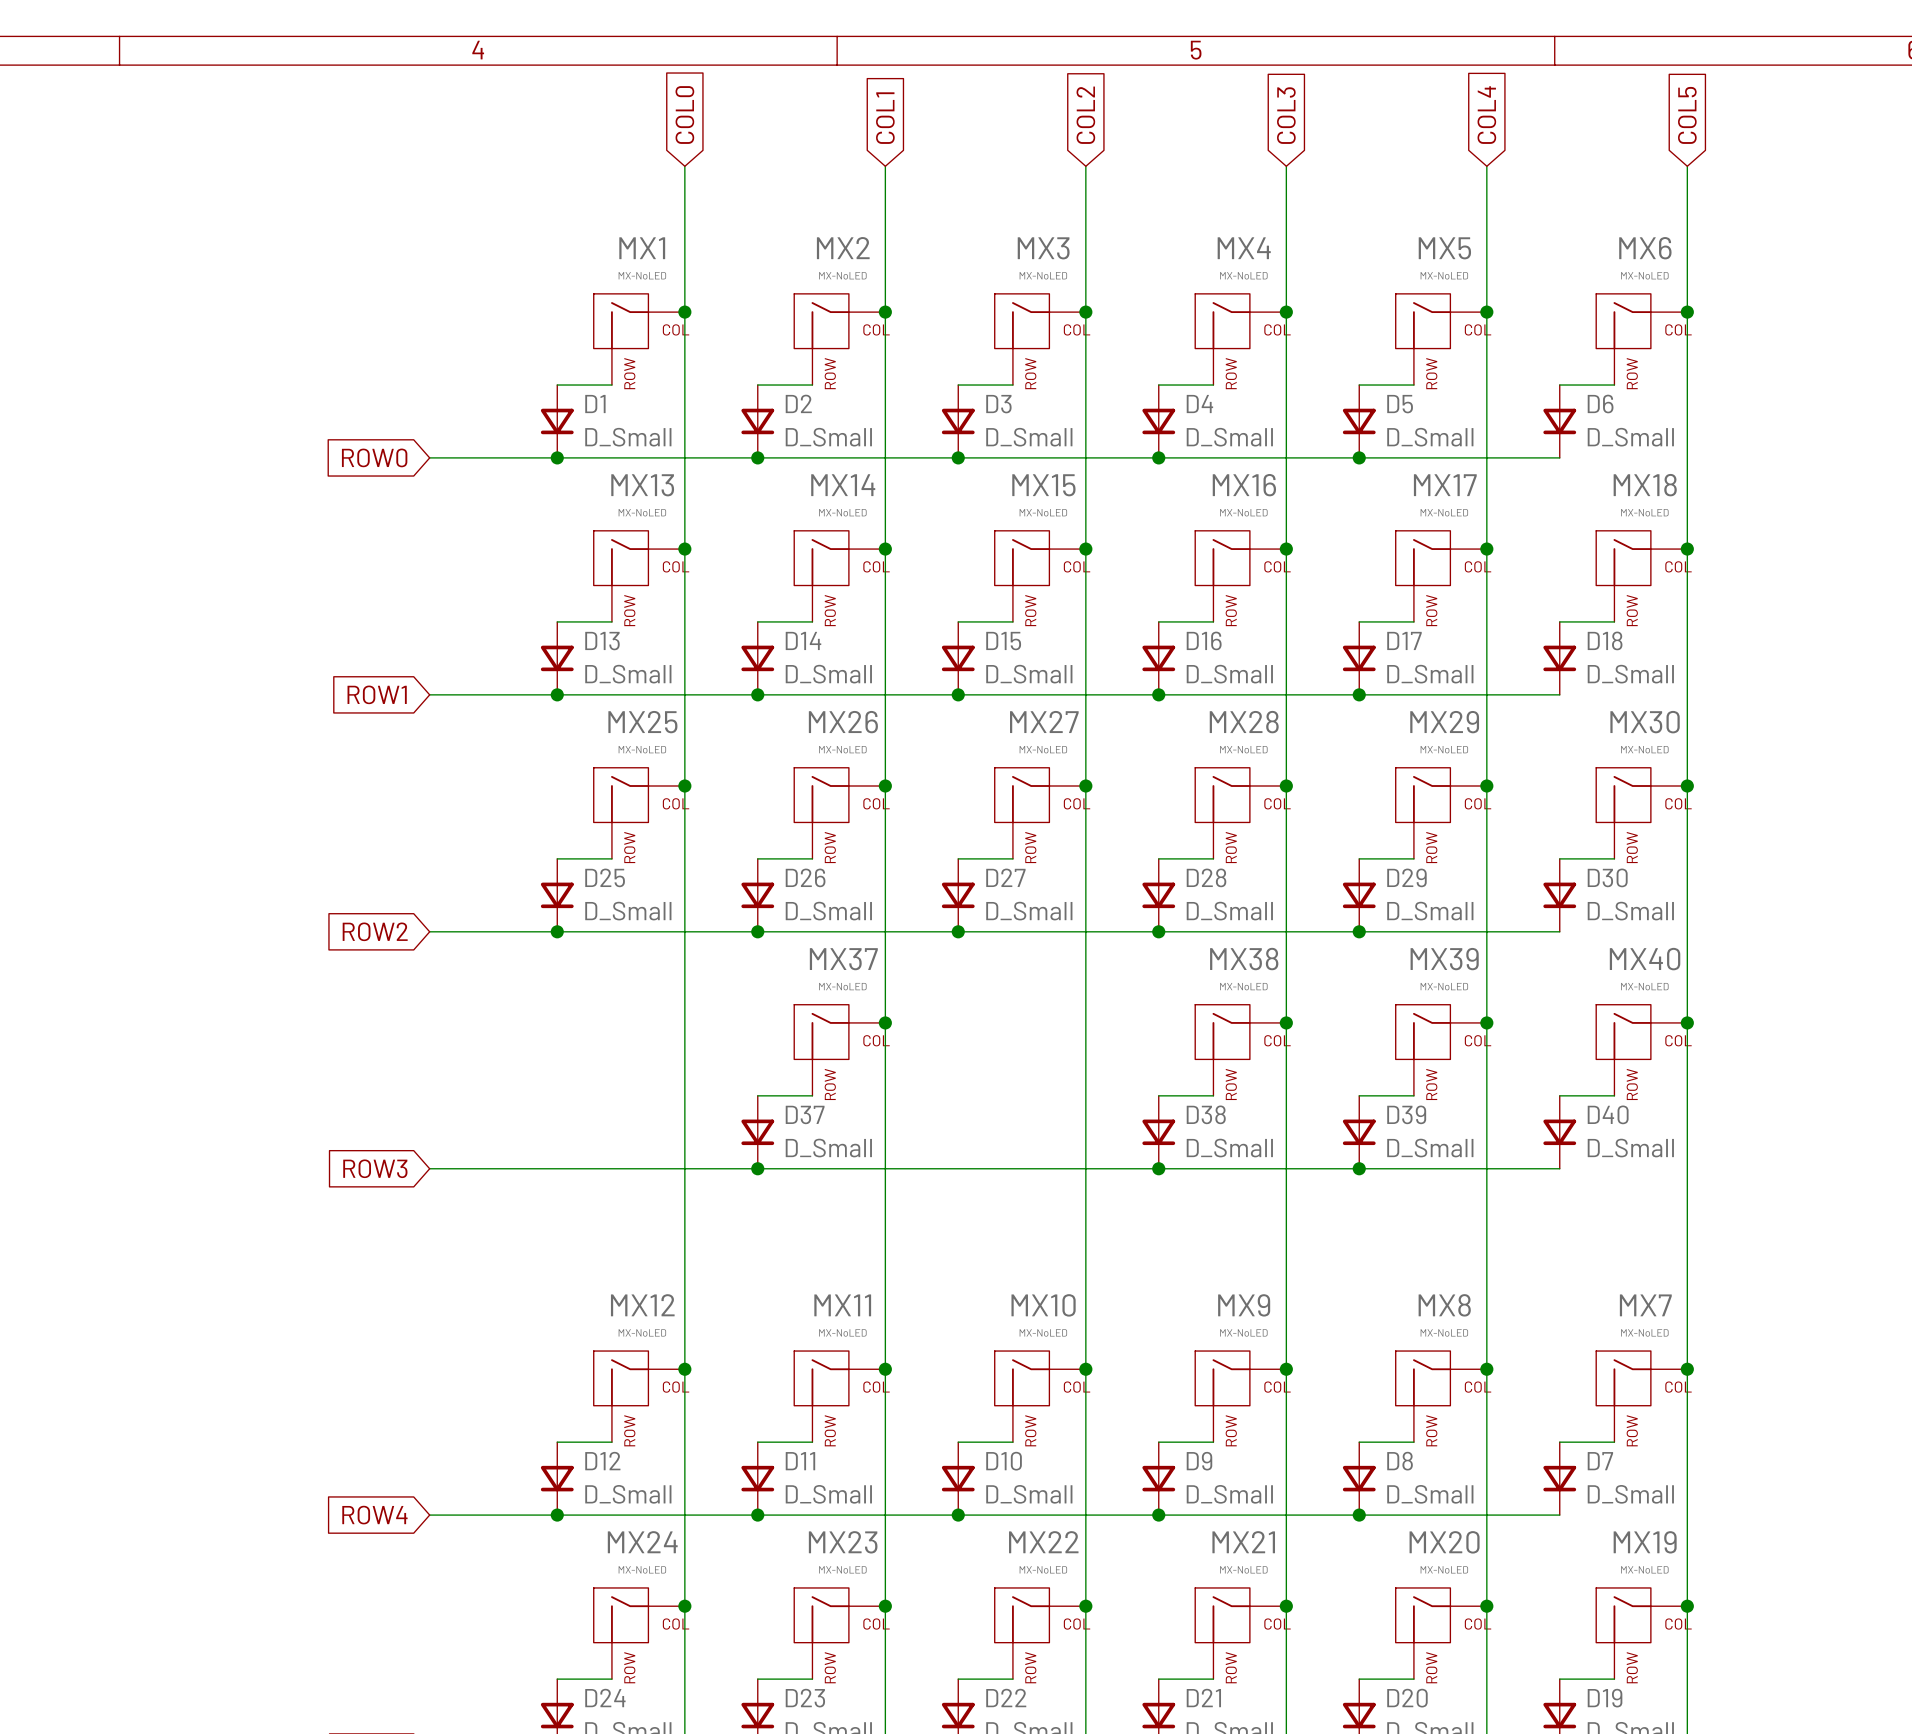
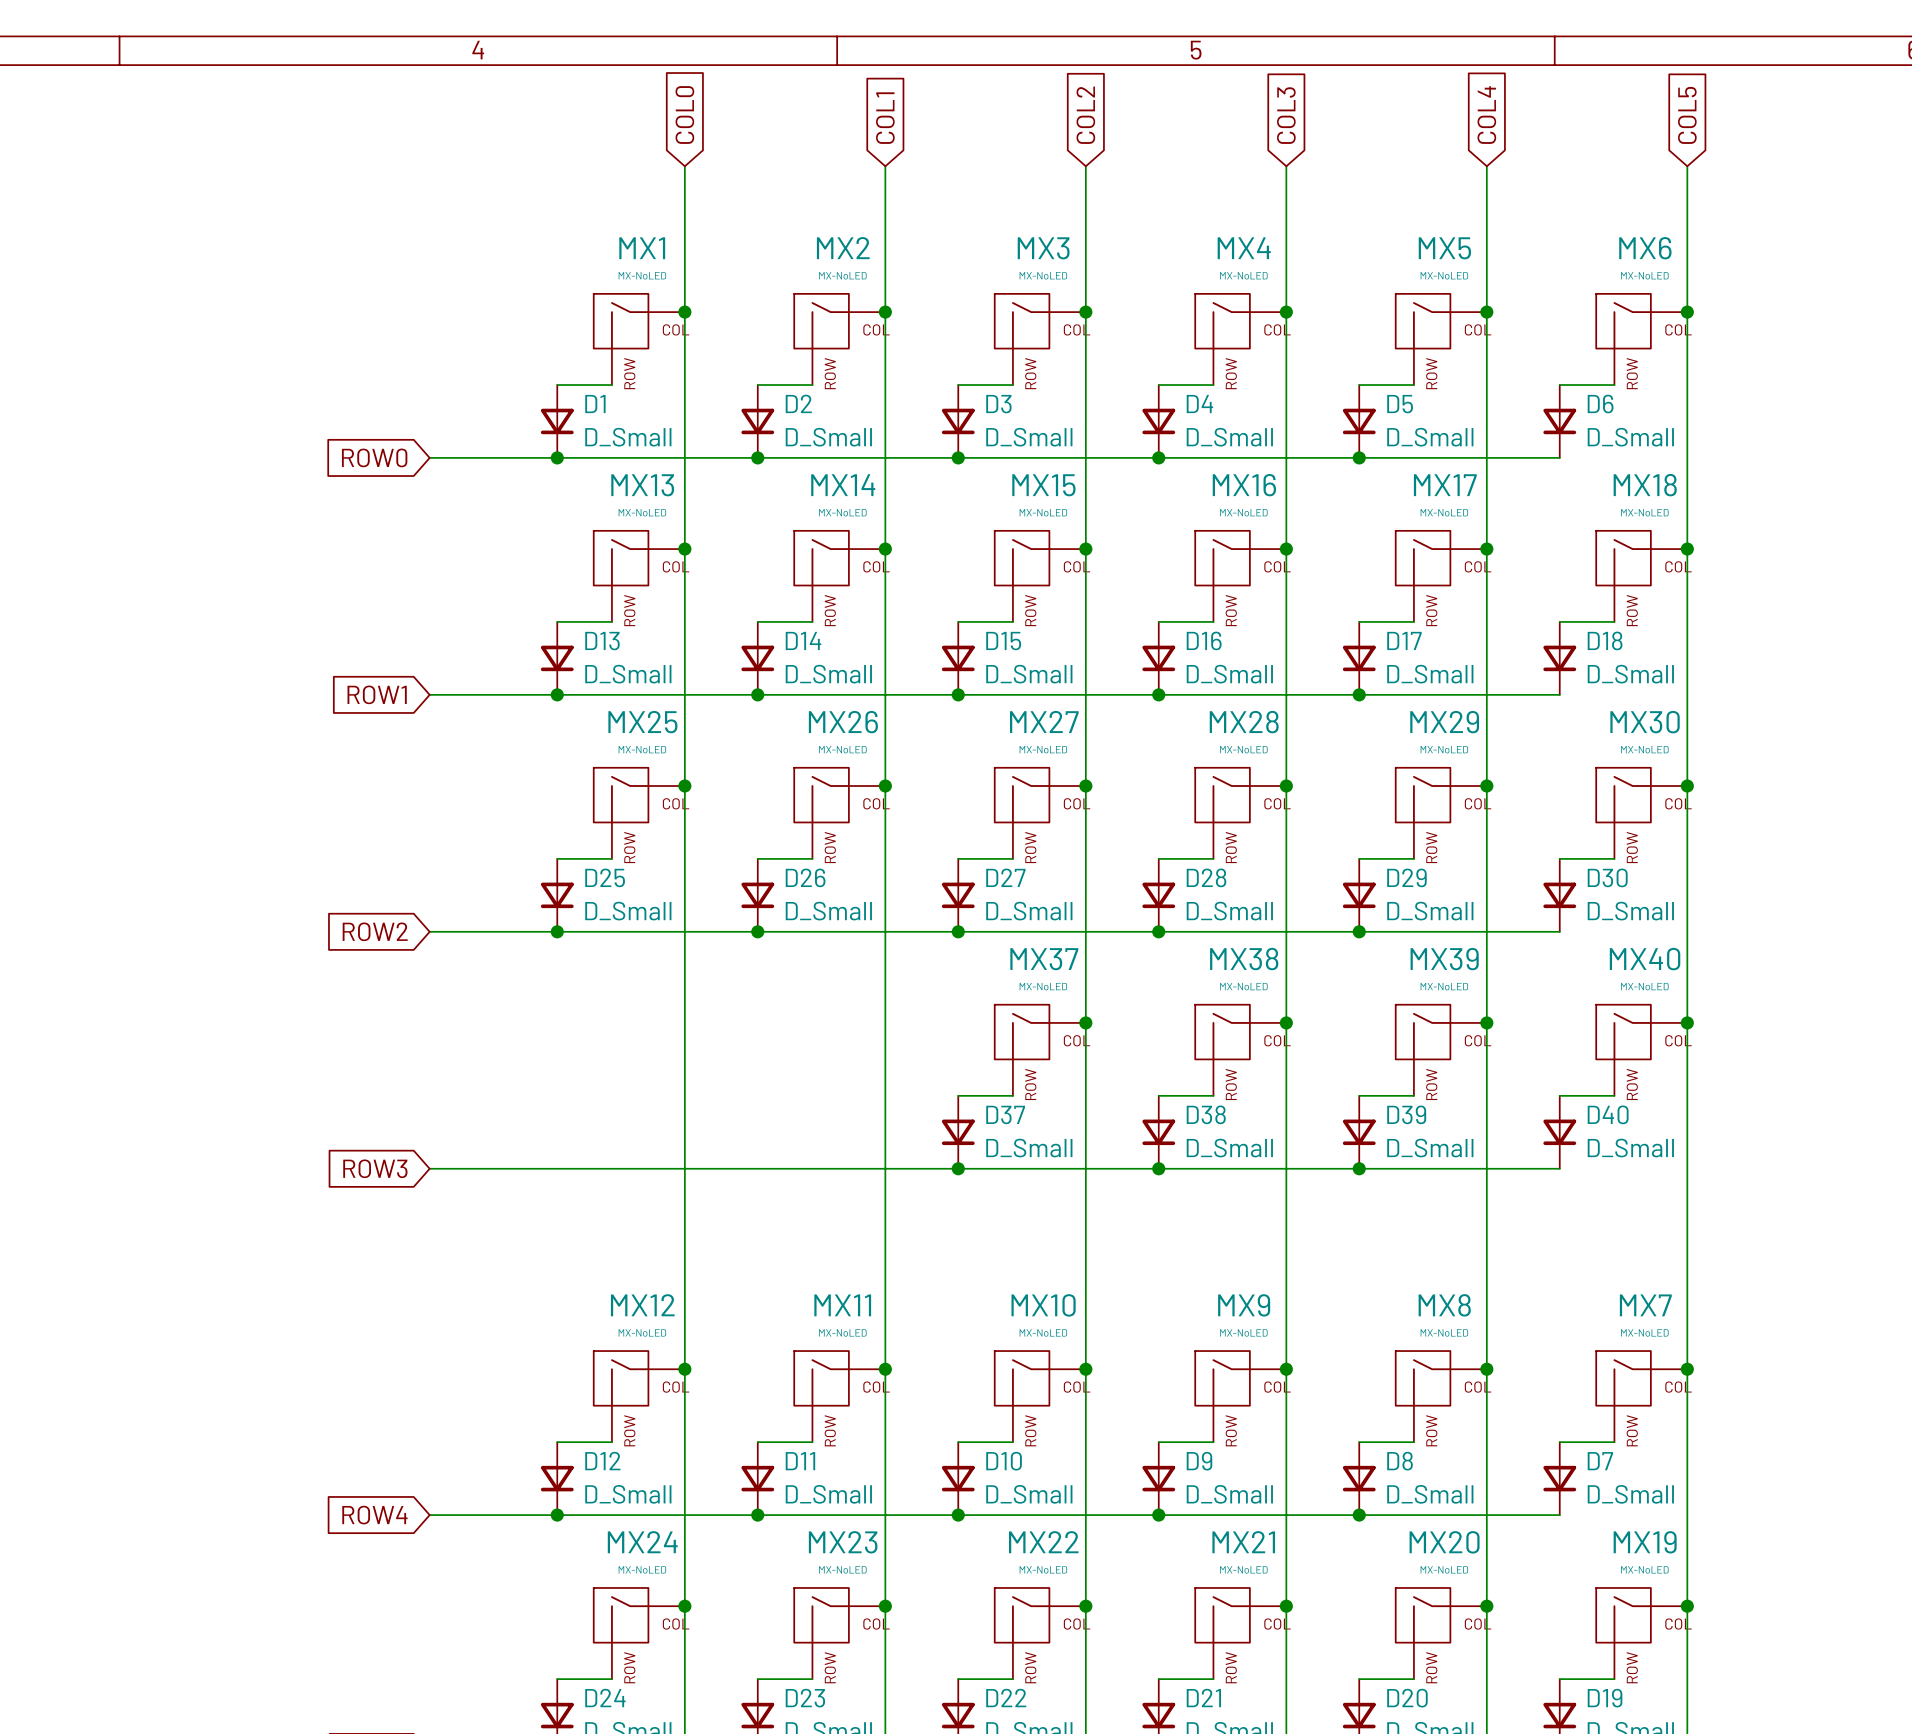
junction: (885, 1022) -> none
junction: none -> (1085, 1022)
MX37 position: (839, 1050) -> (1040, 1050)
wire: (757, 1095) (812, 1095) -> (958, 1095) (1012, 1095)
D37 position: (757, 1132) -> (958, 1132)
junction: (757, 1168) -> none
junction: none -> (958, 1168)

